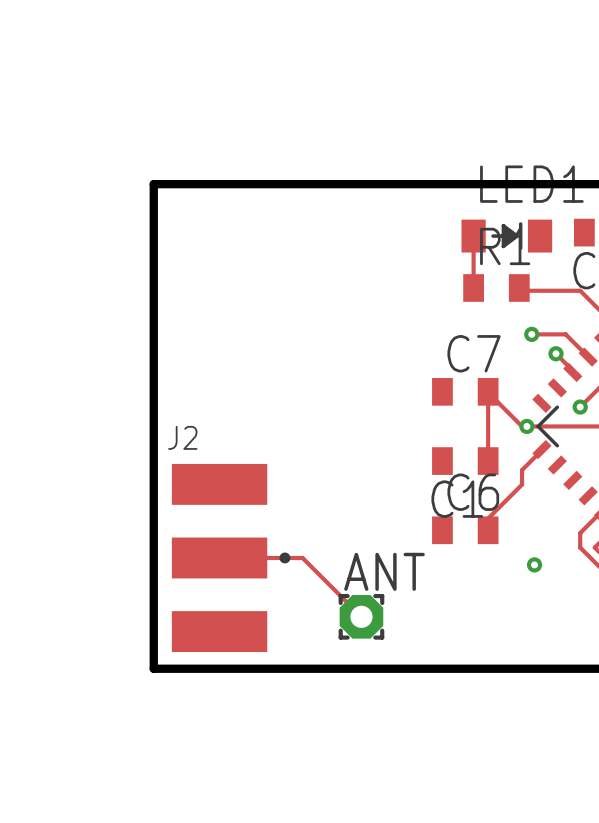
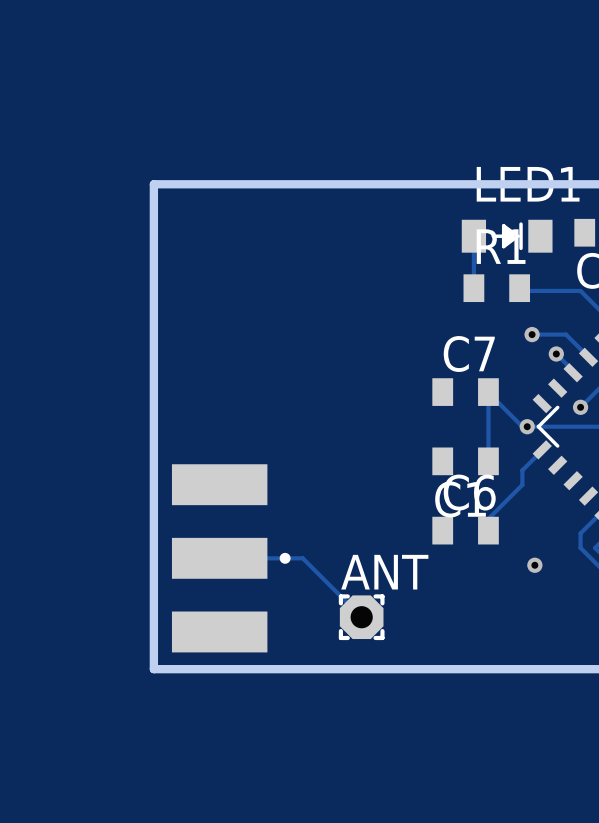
J2 name: J2 (182, 437) -> none

